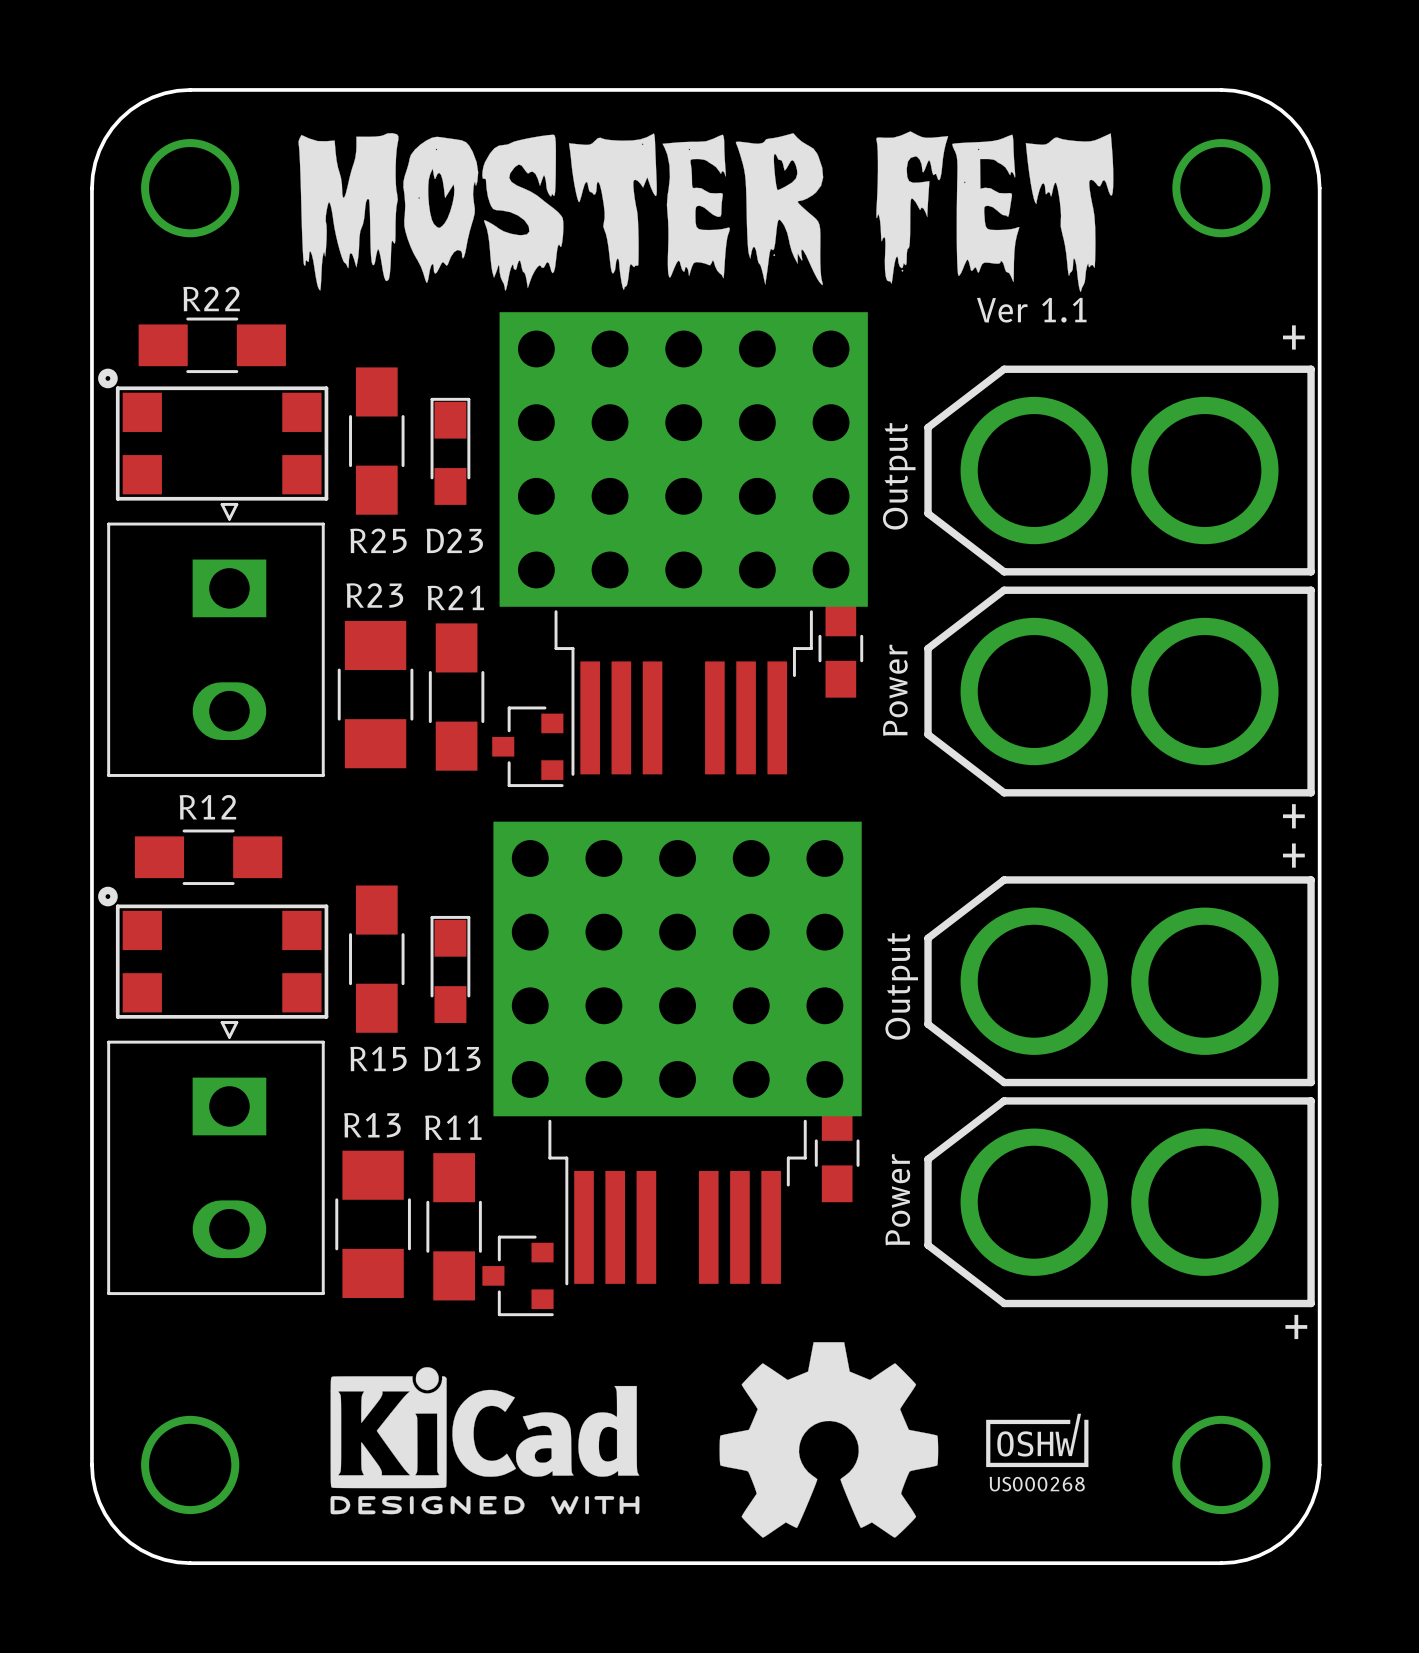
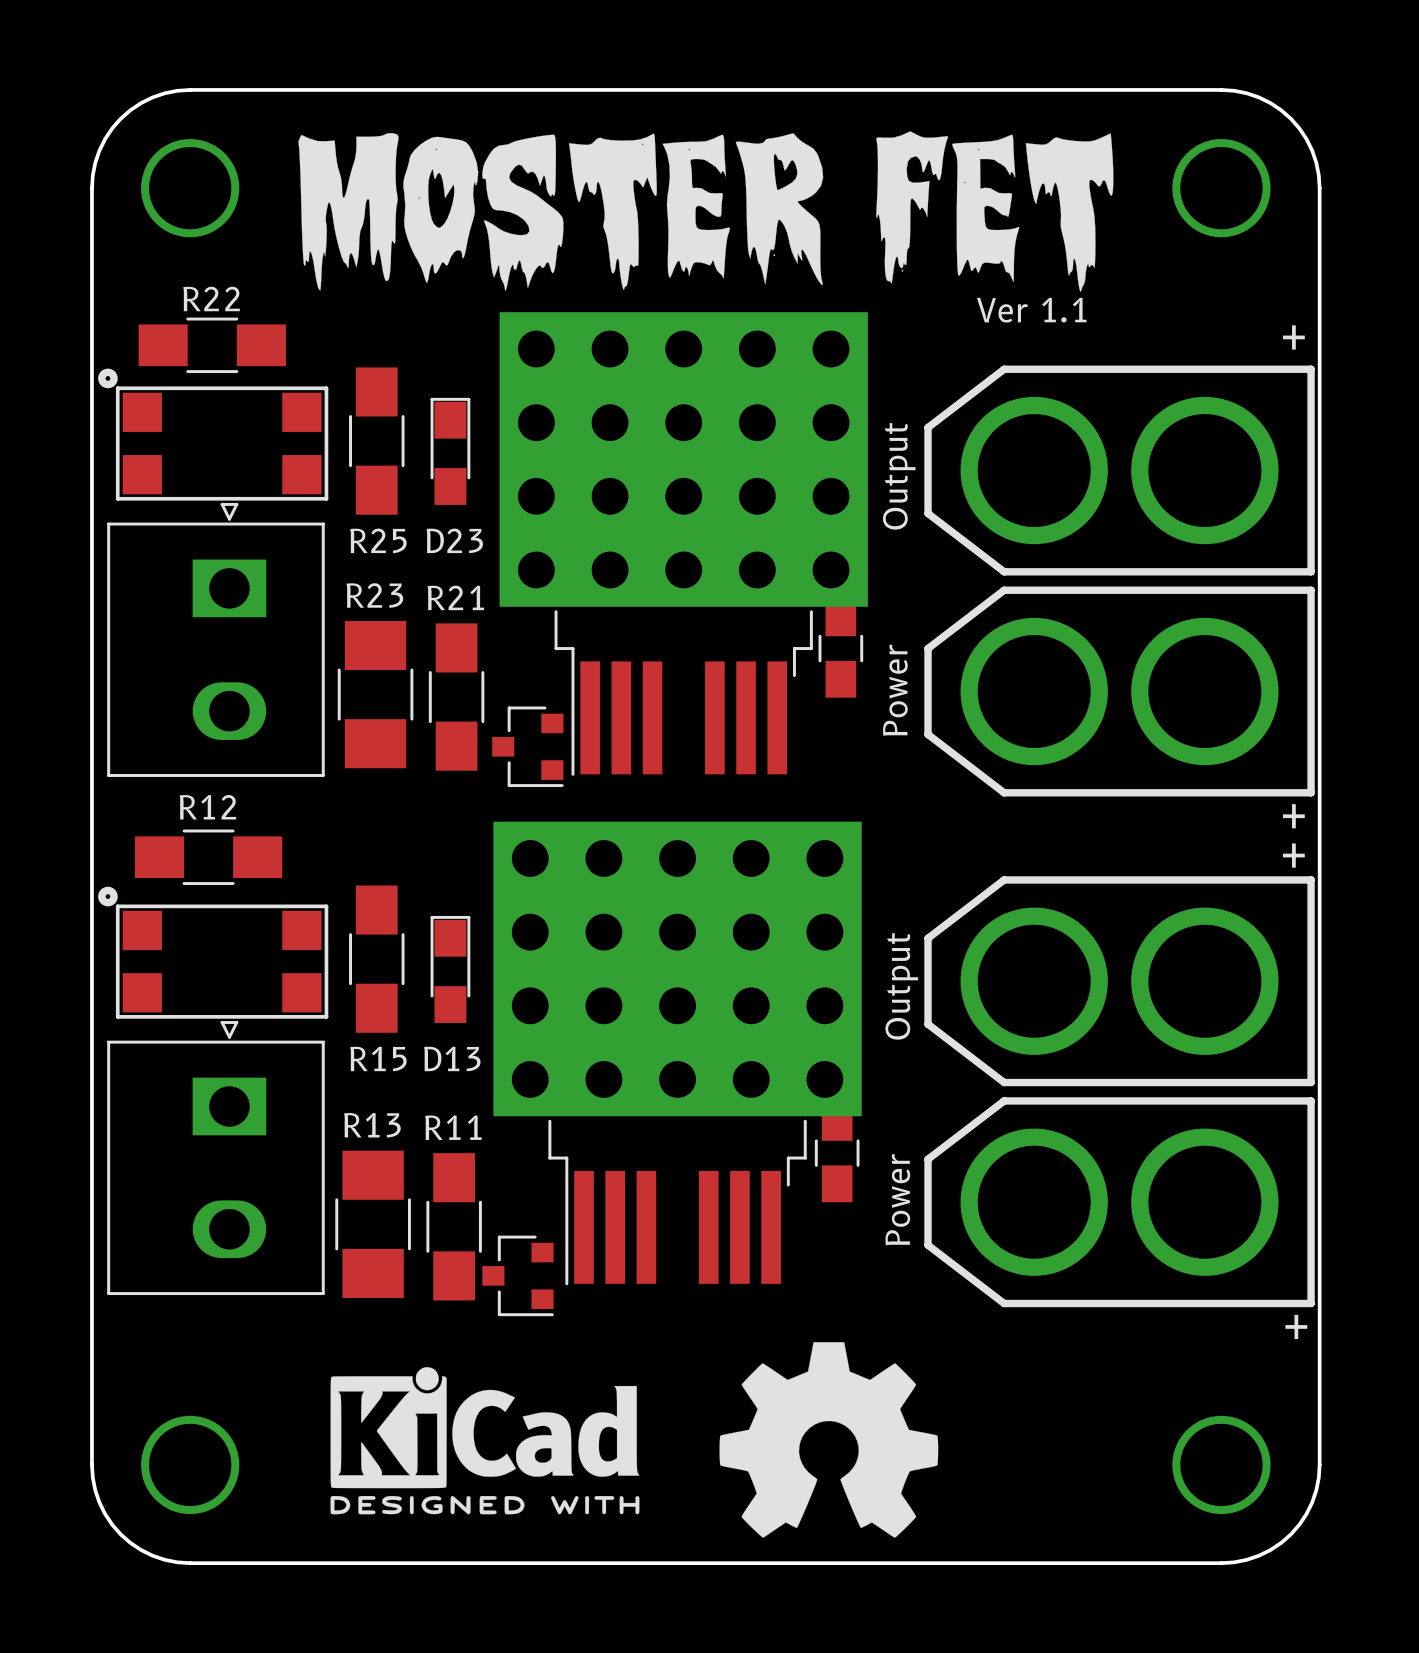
drawing: [986, 1413, 1089, 1468] -> none

